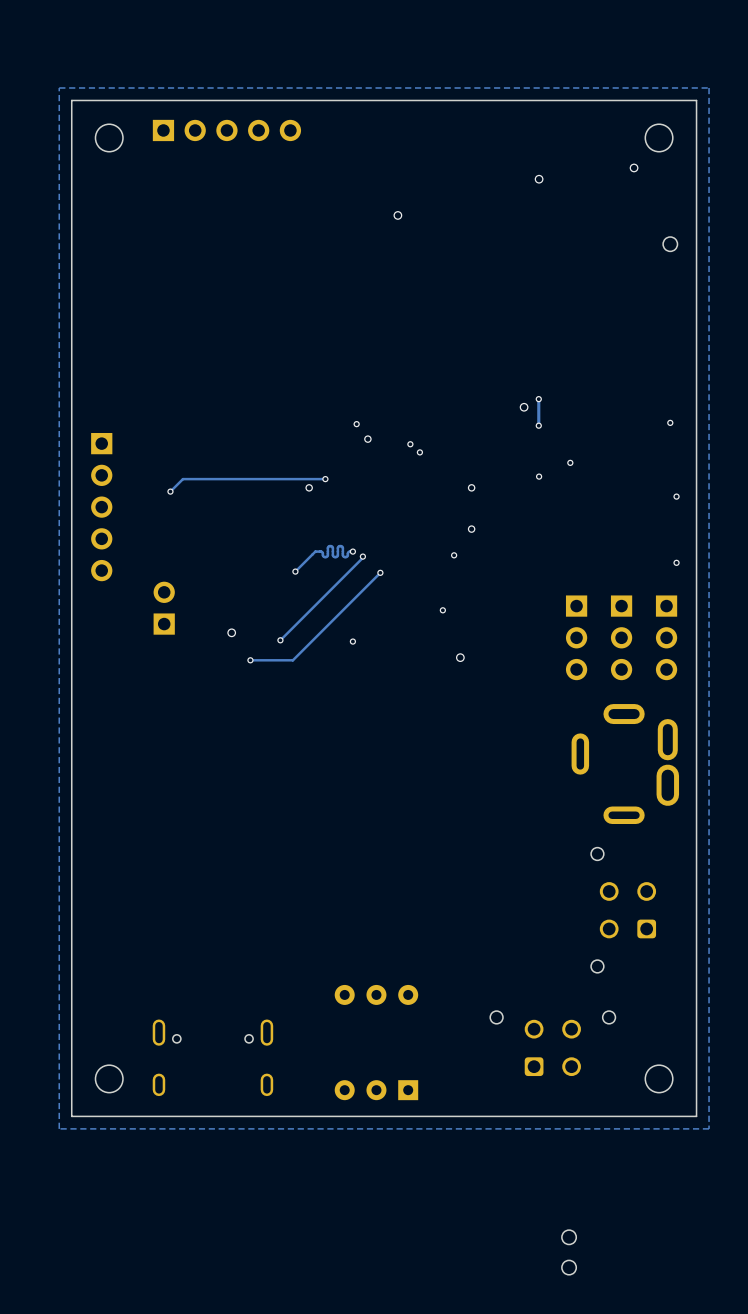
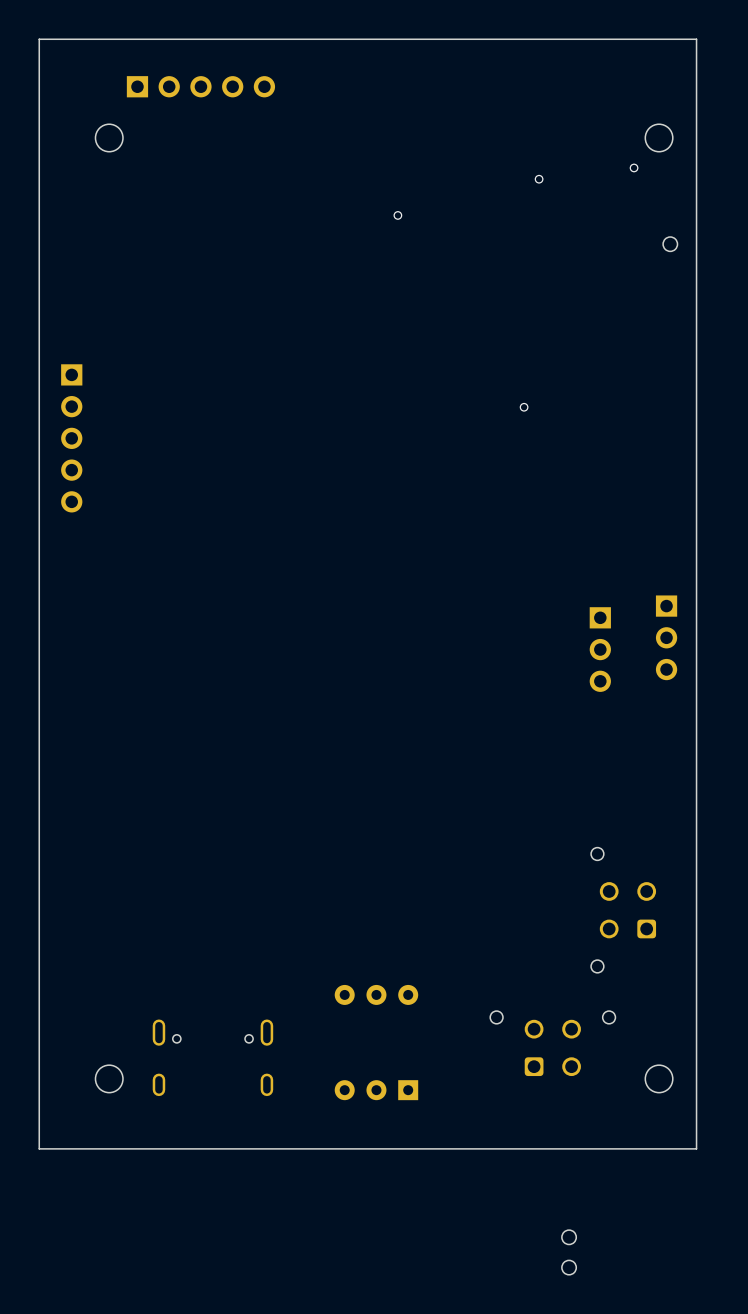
zone outline: (709, 87) (59, 87) (59, 1128) (709, 1128) (709, 87) -> none
board edge: (696, 100) (71, 100) (71, 1116) (696, 1116) -> (696, 100) (696, 39) (39, 39) (39, 1148) (696, 1148) (696, 1116)
part position: (226, 130) -> (200, 86)
track: (538, 399) (538, 425) -> none
via: (538, 399) -> none
via: (670, 422) -> none
via: (356, 424) -> none
via: (538, 425) -> none
via: (367, 439) -> none
via: (410, 444) -> none
via: (419, 452) -> none
via: (570, 462) -> none
via: (539, 476) -> none
track: (325, 479) (182, 479) (170, 491) -> none
via: (325, 479) -> none
via: (309, 487) -> none
via: (471, 487) -> none
via: (170, 491) -> none
via: (676, 496) -> none
part position: (101, 507) -> (71, 438)
via: (471, 529) -> none
track: (352, 551) (348, 551) (347, 556) (344, 556) (342, 547) (339, 546) (337, 555) (334, 557) (332, 547) (329, 546) (327, 556) (323, 556) (321, 551) (315, 551) (295, 571) -> none
via: (352, 551) -> none
via: (454, 555) -> none
track: (362, 556) (280, 640) -> none
via: (362, 556) -> none
via: (676, 562) -> none
via: (295, 571) -> none
track: (380, 572) (292, 660) (250, 660) -> none
via: (380, 572) -> none
part: (164, 608) -> none
via: (442, 610) -> none
via: (231, 632) -> none
part: (576, 637) -> none
part: (621, 637) -> none
via: (280, 640) -> none
via: (352, 641) -> none
part: none -> (600, 649)
via: (460, 657) -> none
via: (250, 660) -> none
part: (625, 764) -> none

